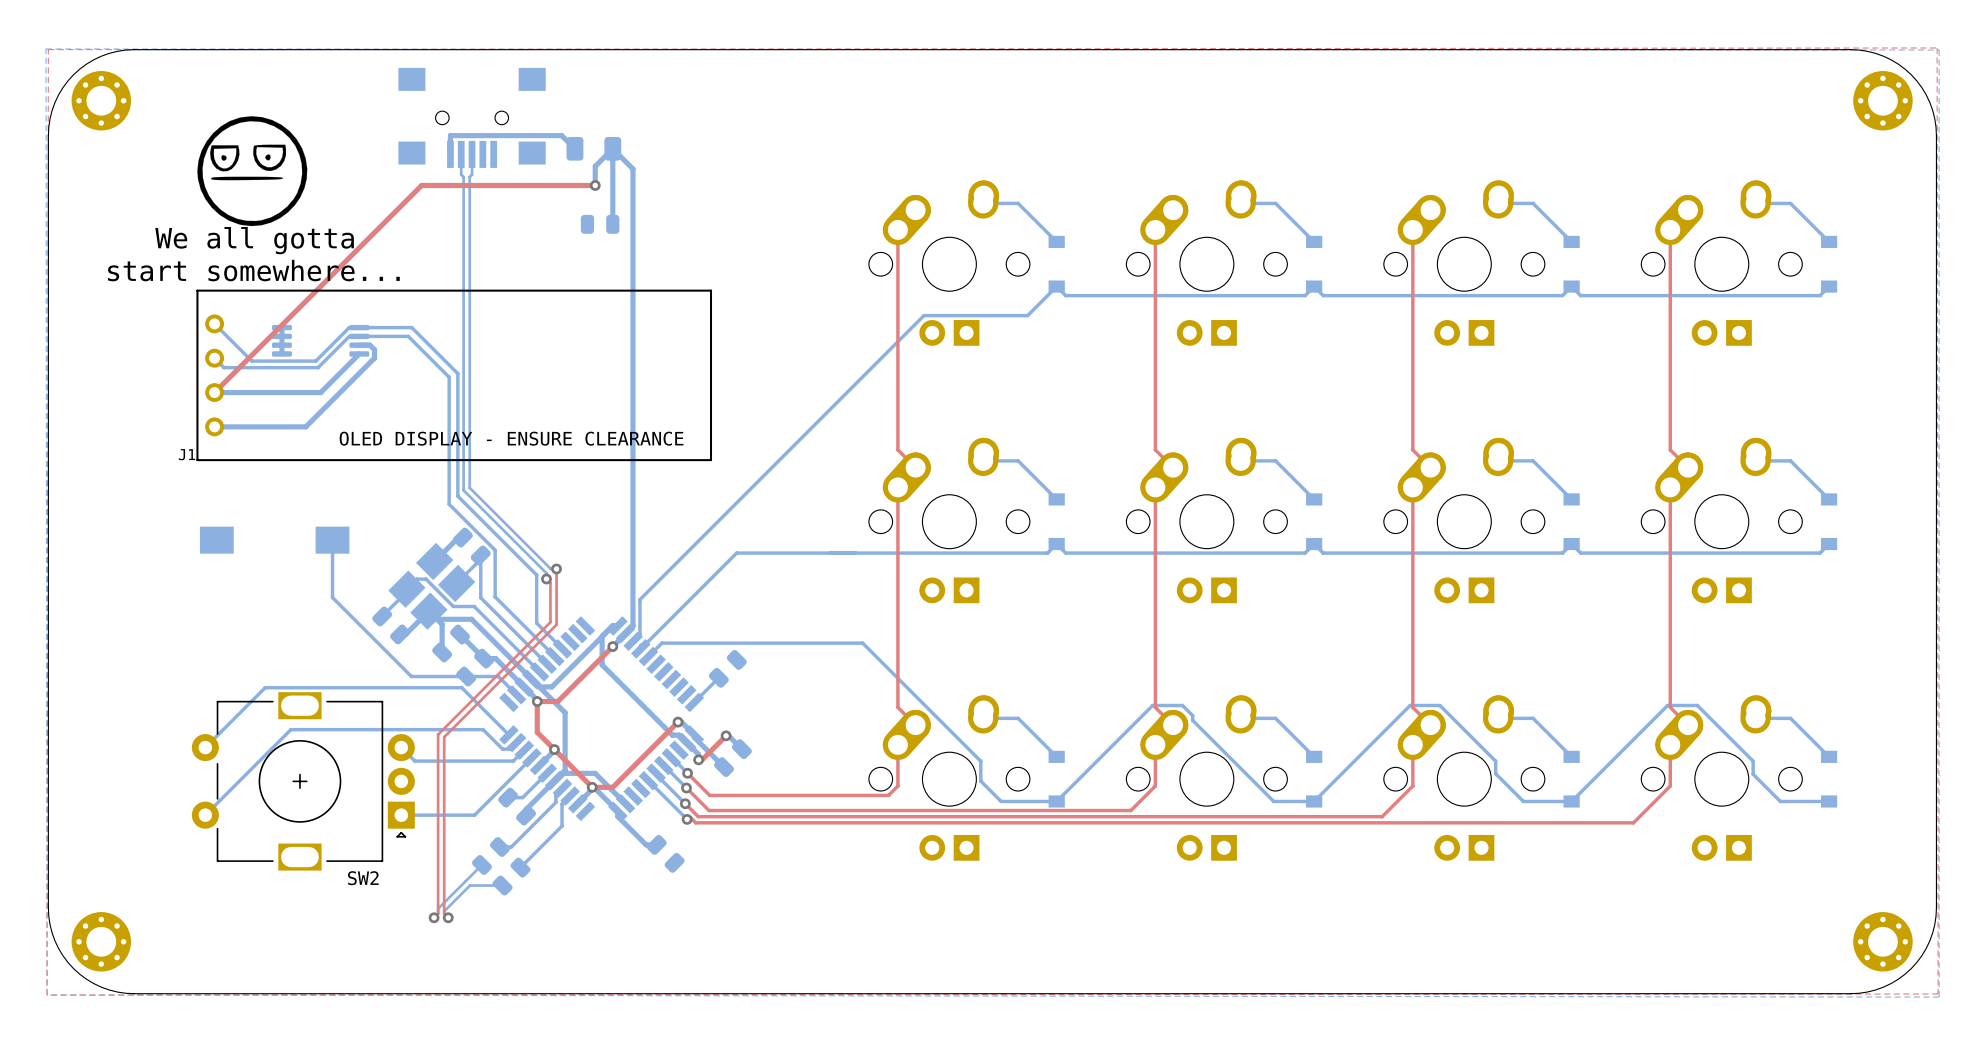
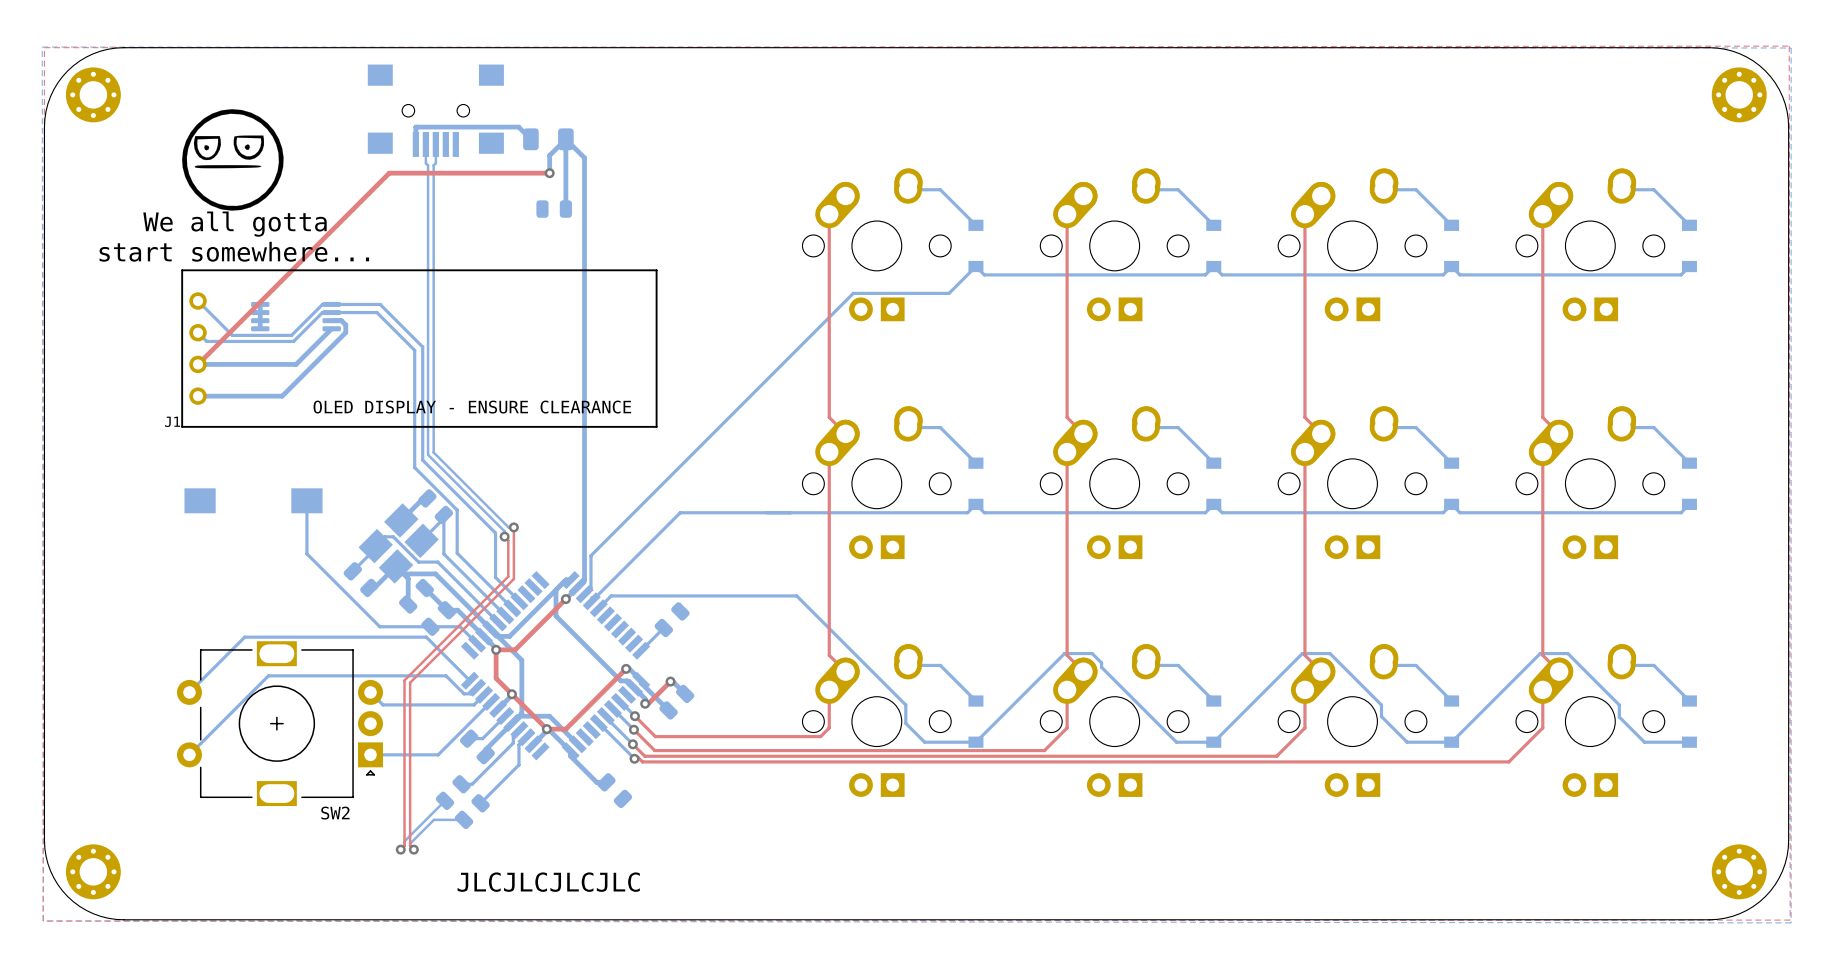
text: none -> JLCJLCJLCJLC (548, 882)

